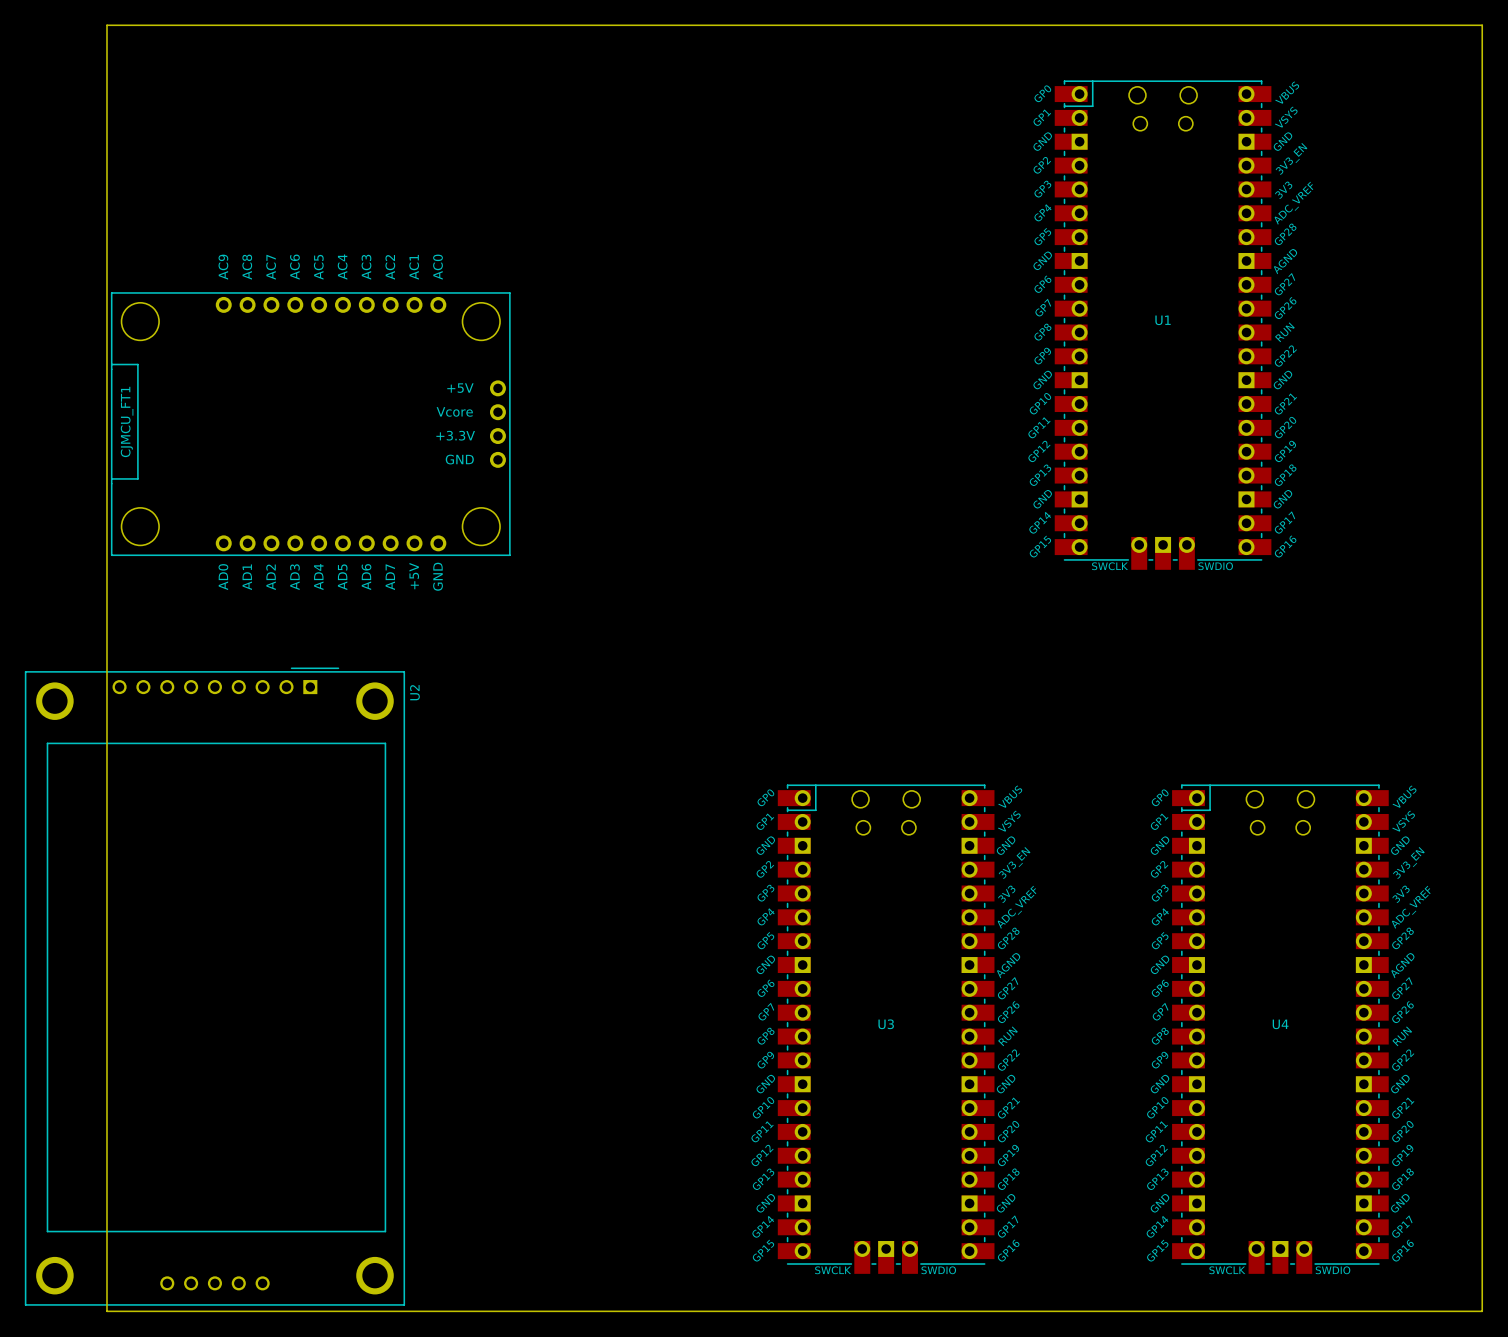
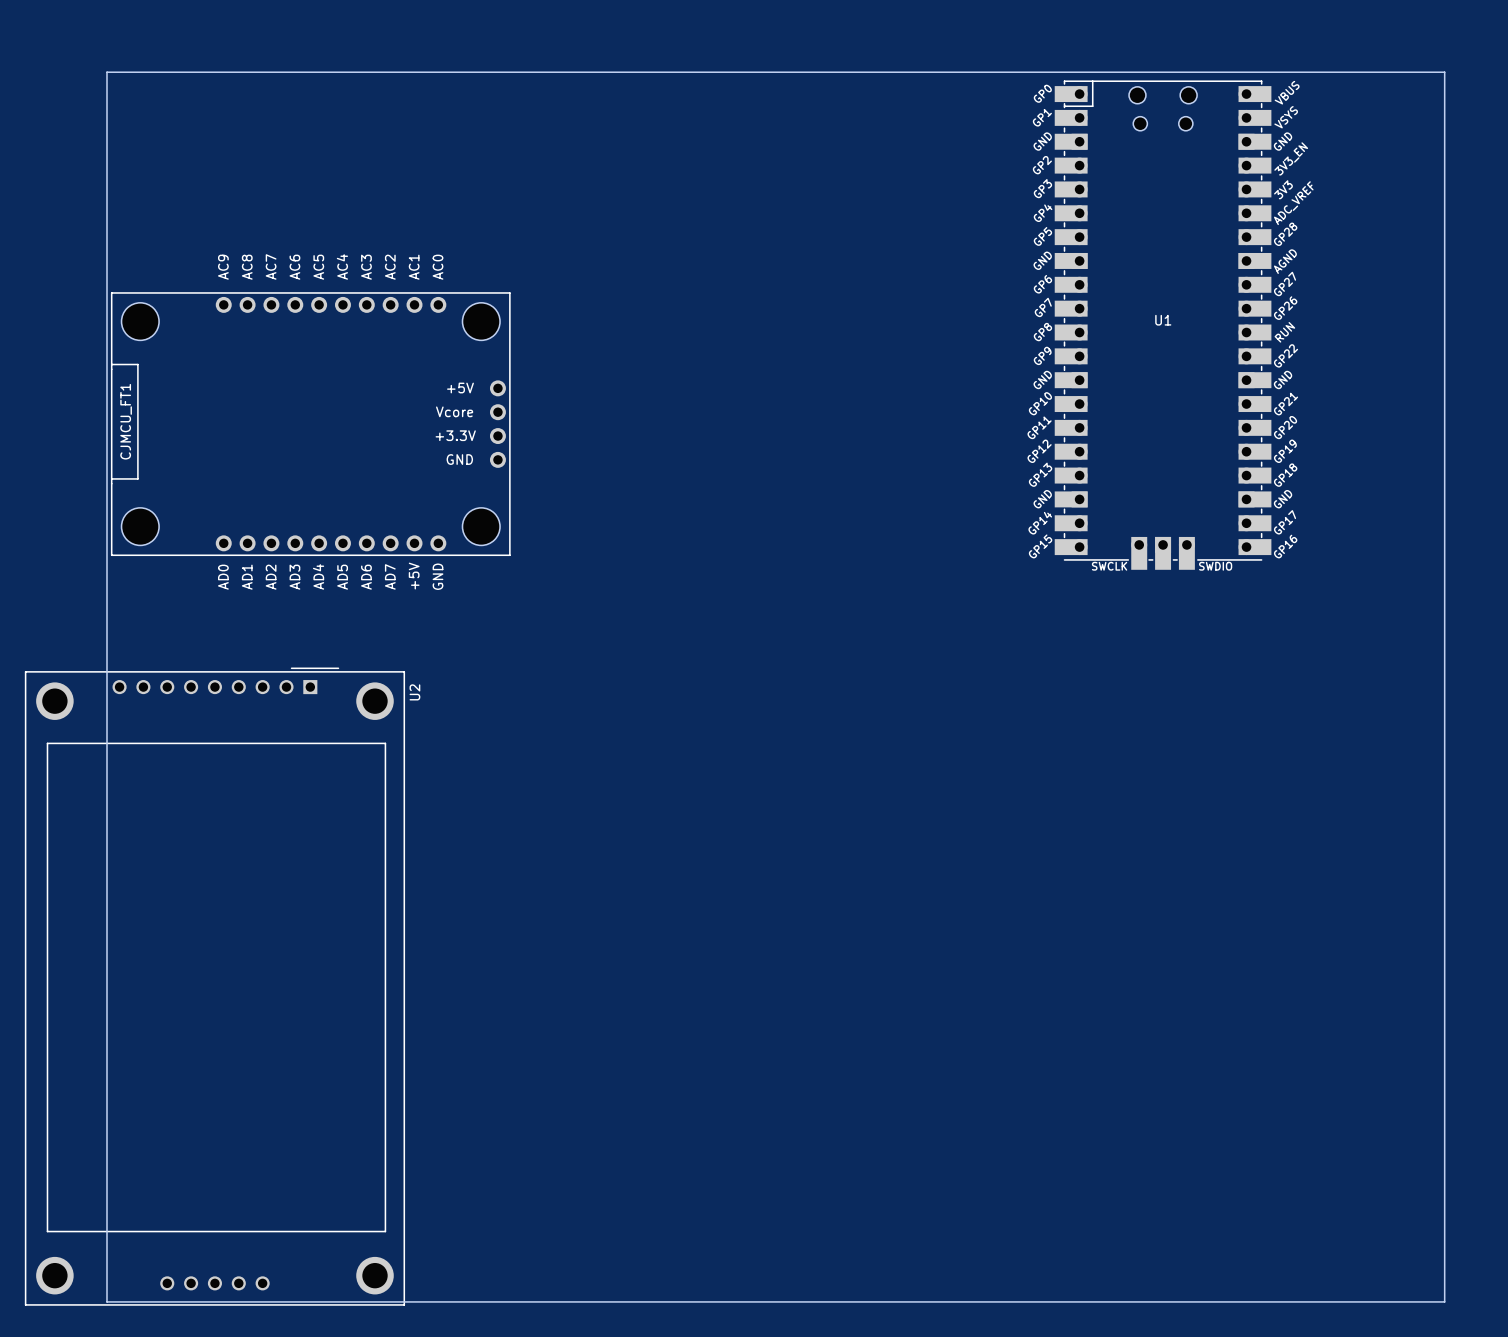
board edge: (106, 72) (106, 25) (1482, 25) (1482, 1311) (106, 1311) (106, 1301) -> (106, 72) (1444, 72) (1444, 1301) (106, 1301)
U3: (886, 1029) -> none
U4: (1280, 1029) -> none

